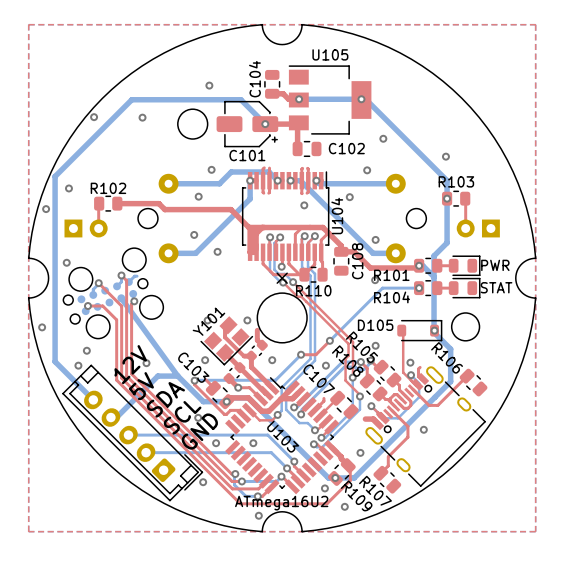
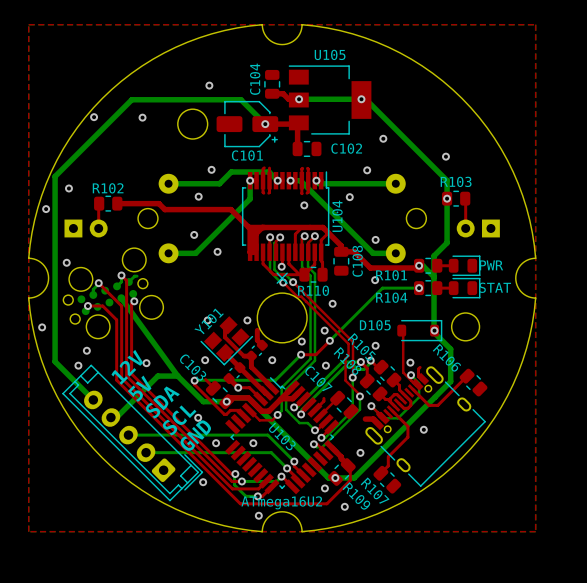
via: none -> (332, 303)
via: none -> (324, 330)
via: none -> (301, 341)

